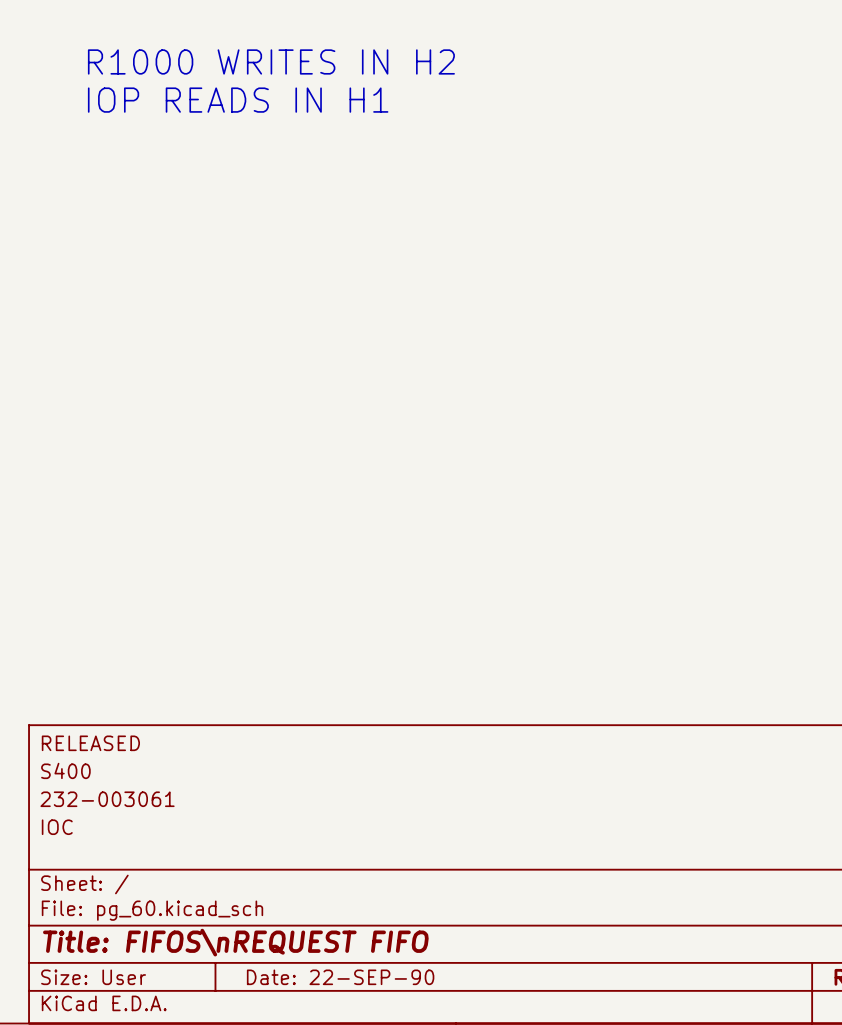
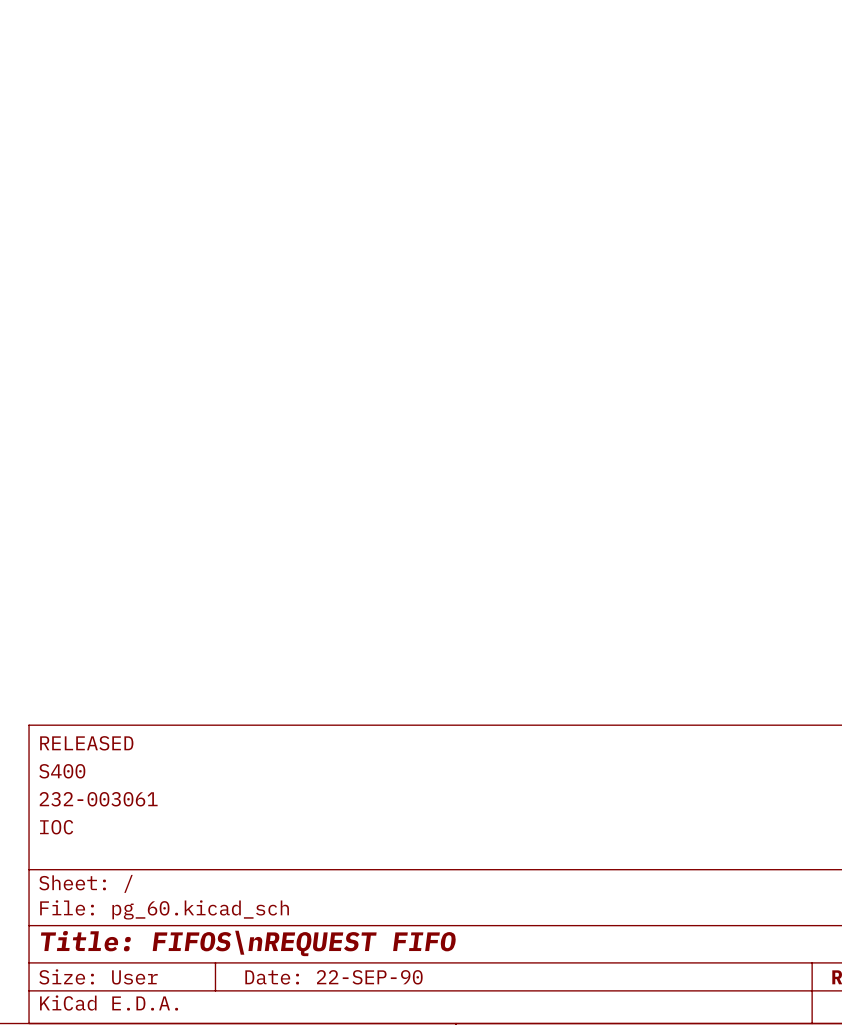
text: R1000 WRITES IN H2 (271, 61) -> none
text: IOP READS IN H1 (238, 100) -> none

